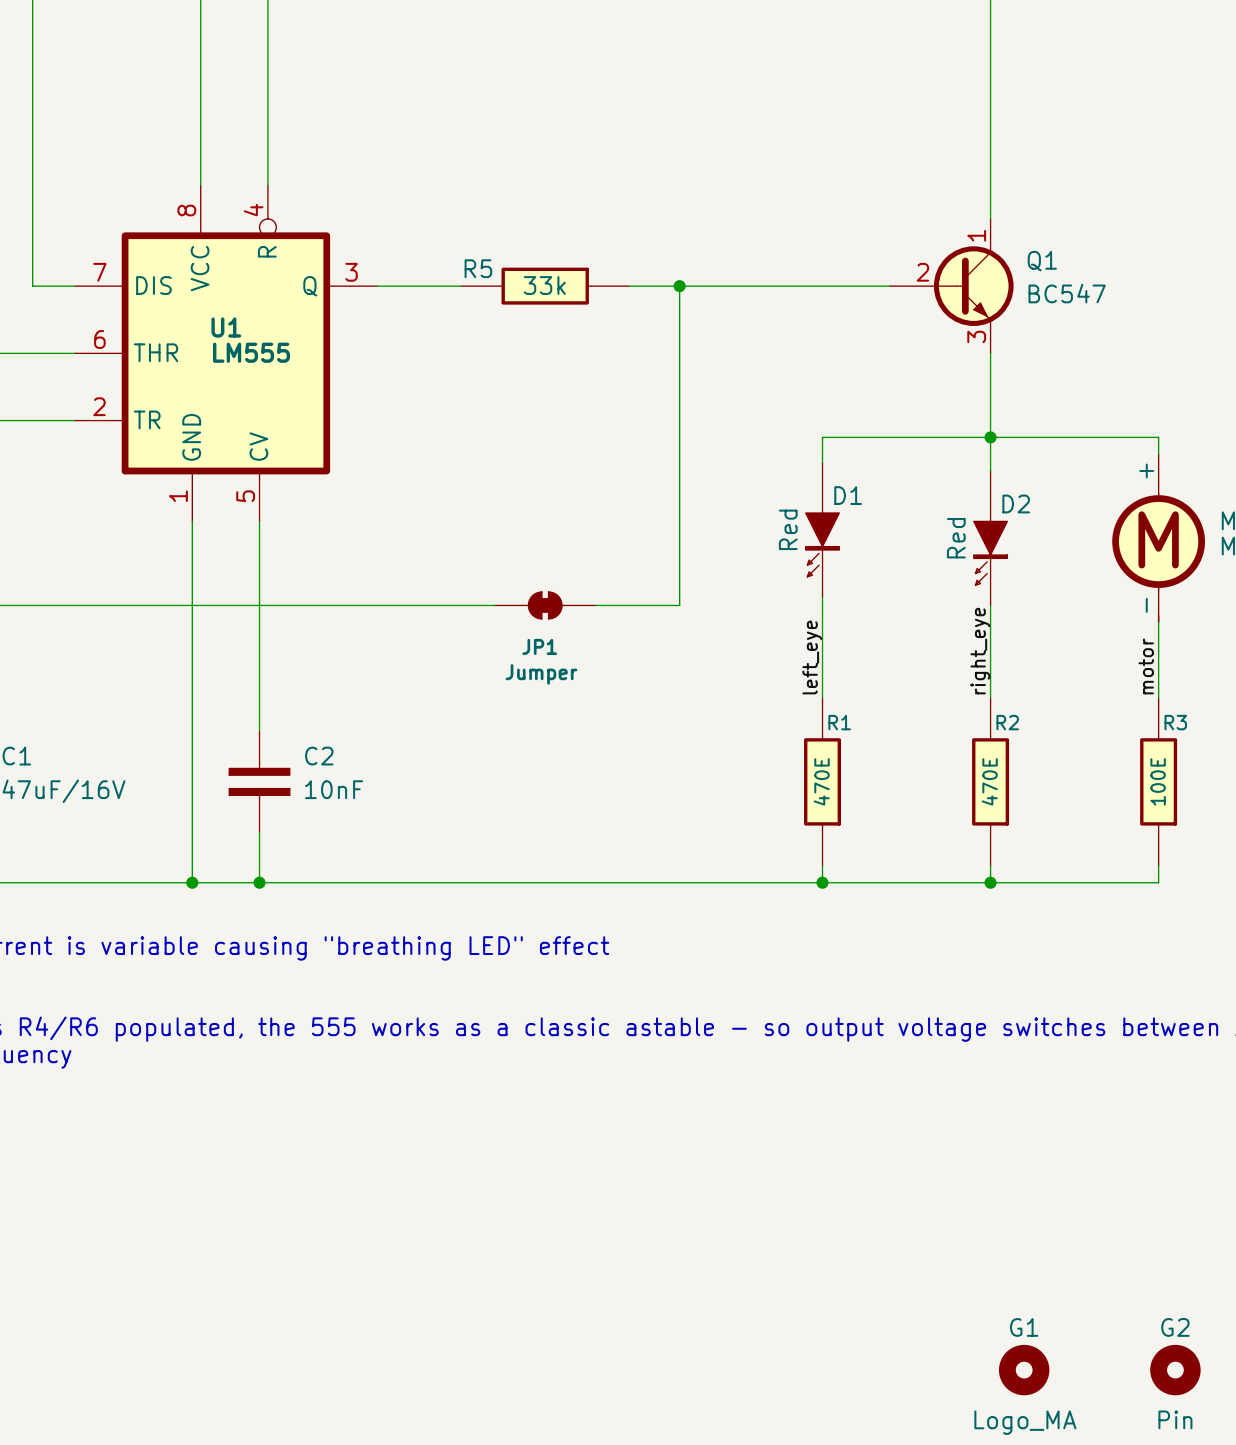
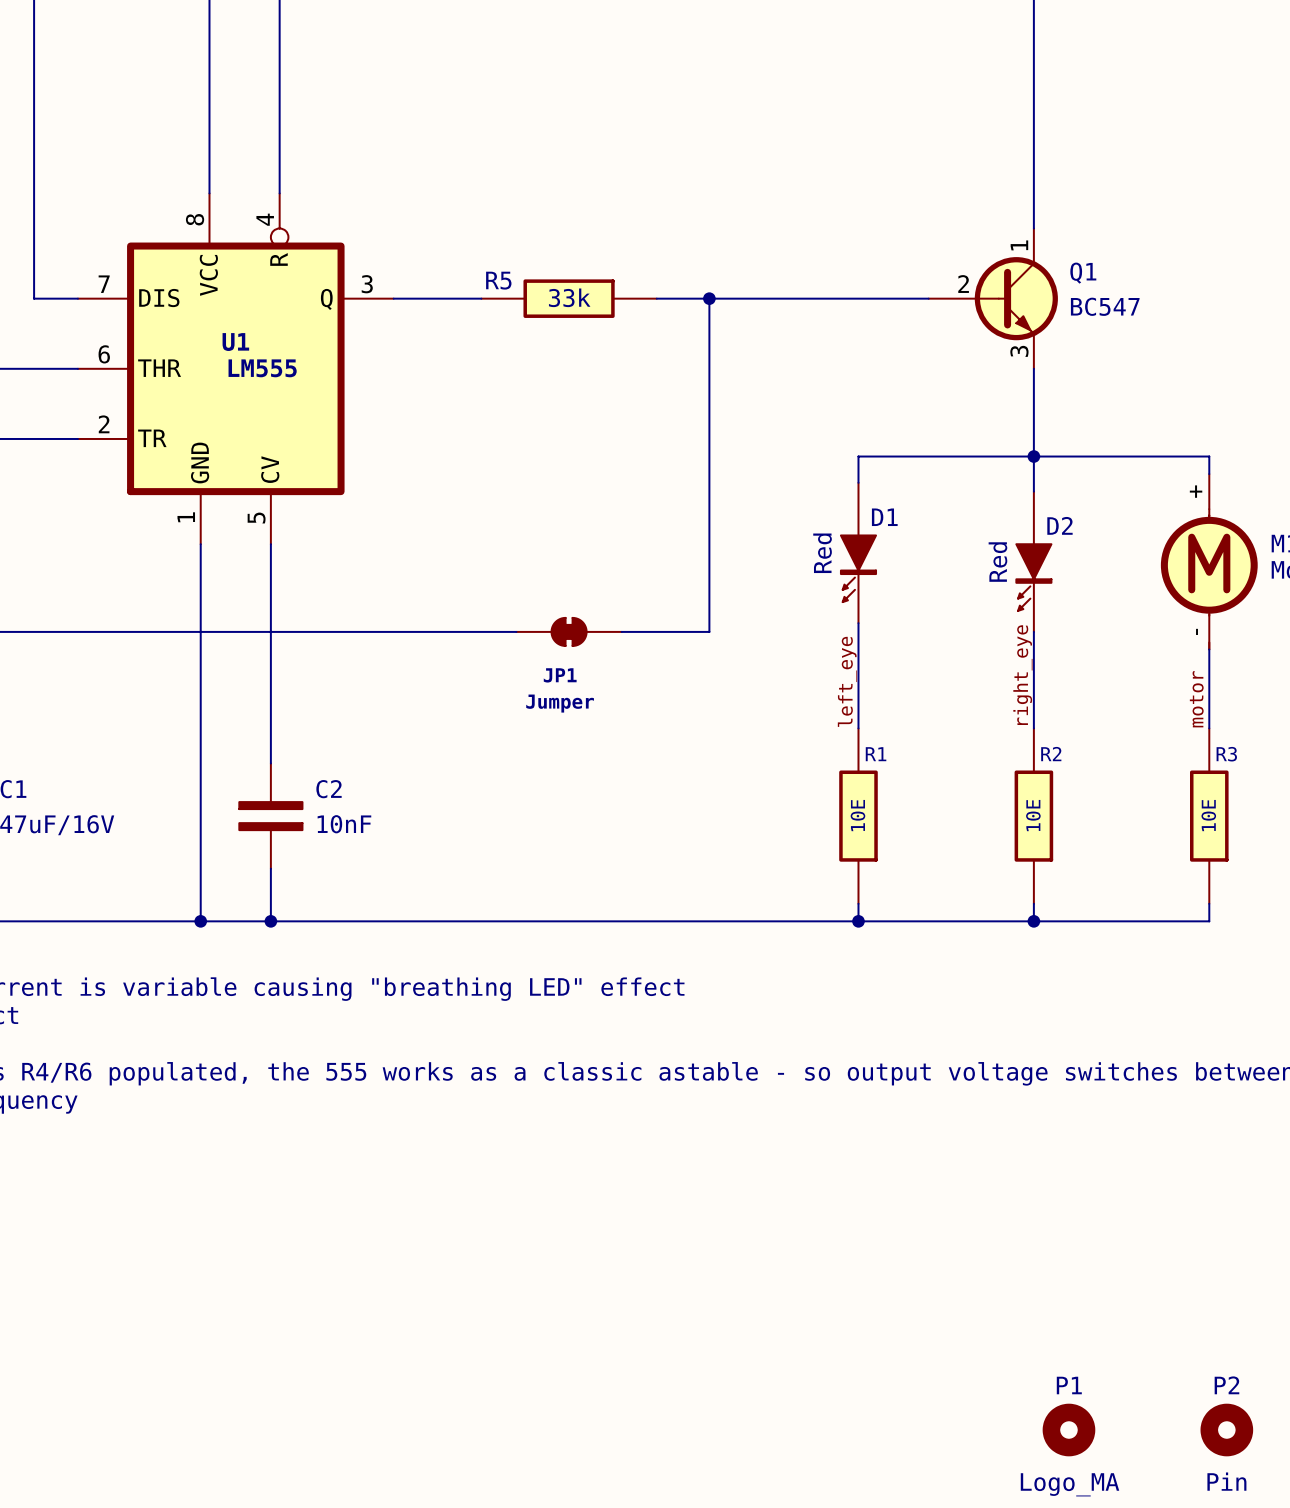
R1 value: 470E (821, 781) -> 10E (857, 815)
R2 value: 470E (989, 781) -> 10E (1033, 815)
R3 value: 100E (1158, 781) -> 10E (1208, 815)
G1 name: G1 (1024, 1327) -> P1 (1069, 1385)
G2 name: G2 (1175, 1327) -> P2 (1226, 1385)

